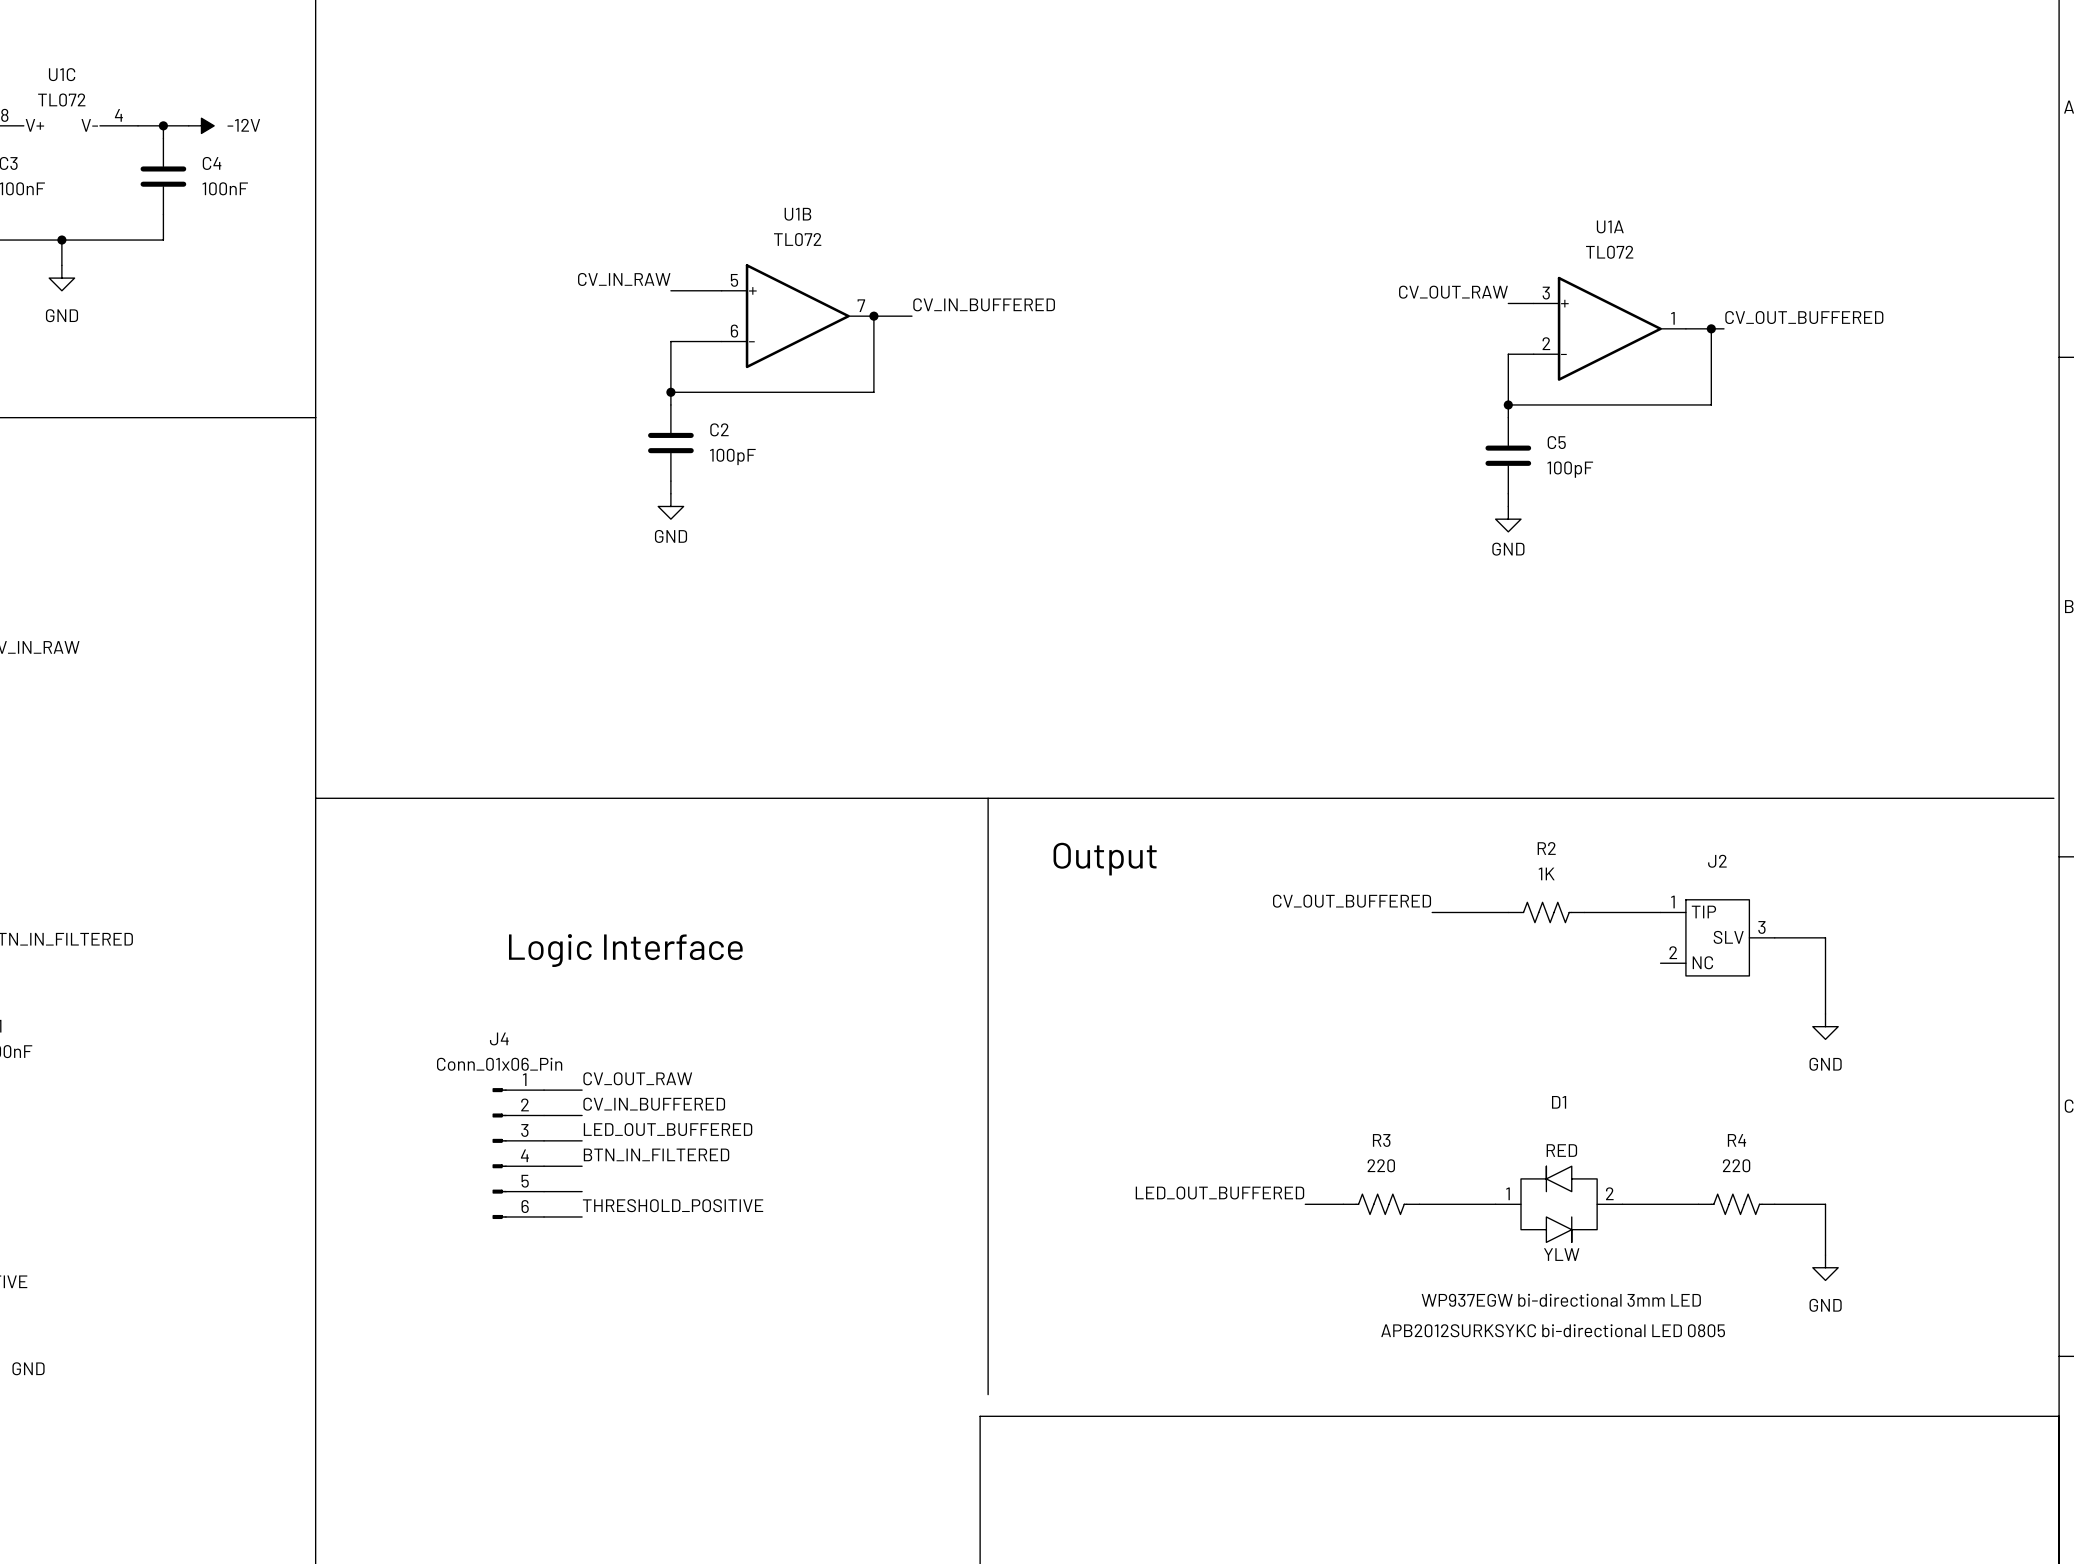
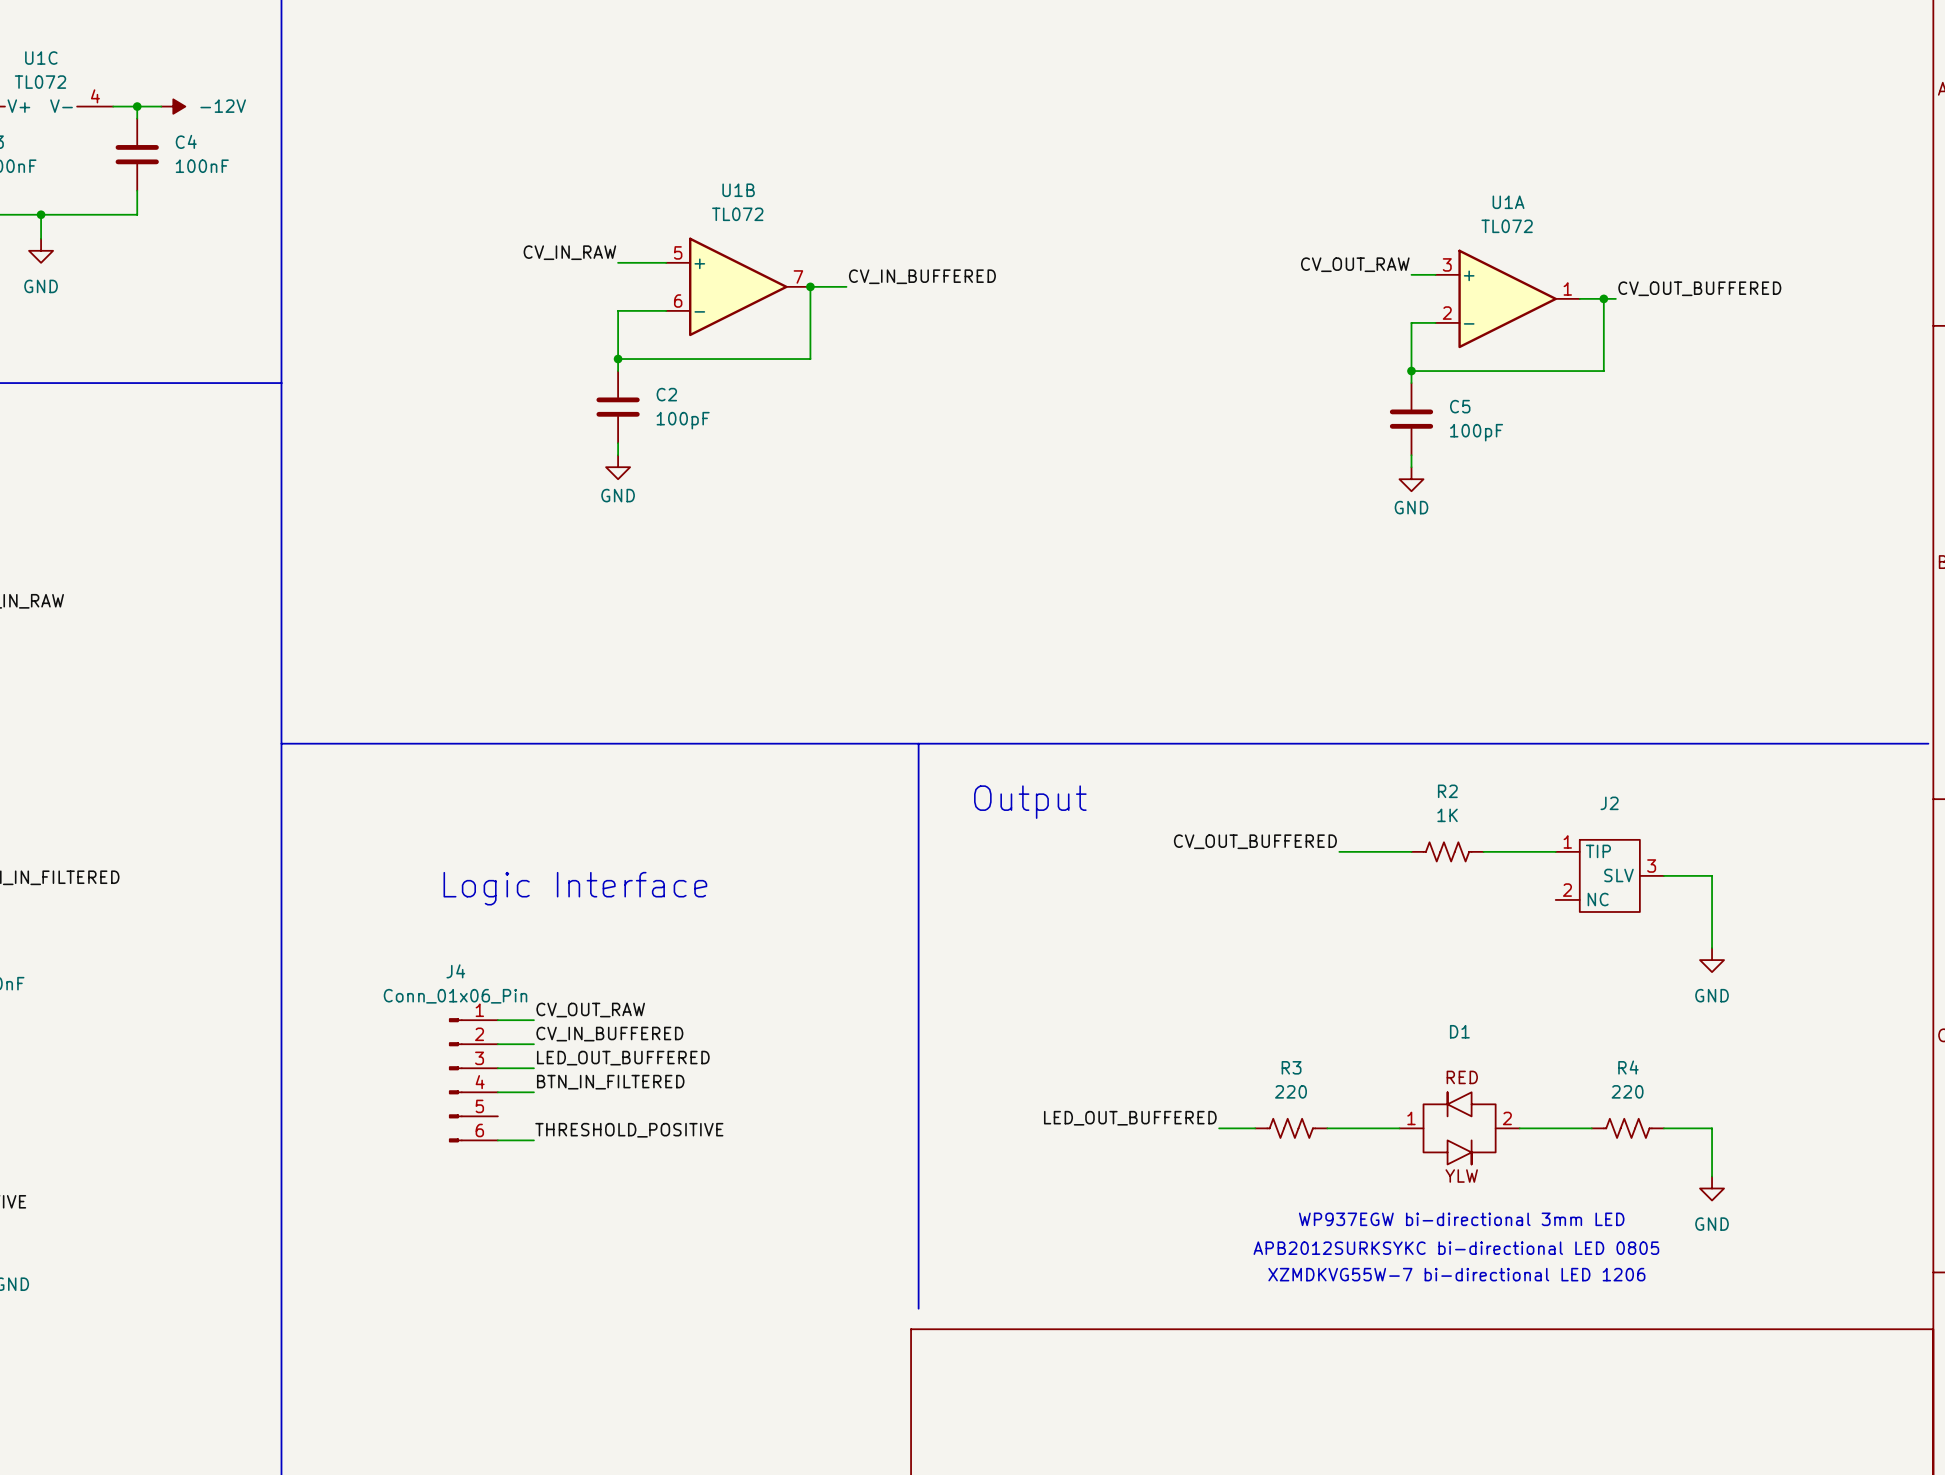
wire: (544, 1191) (582, 1191) -> none
text: none -> XZMDKVG55W-7 bi-directional LED 1206 (1456, 1274)

